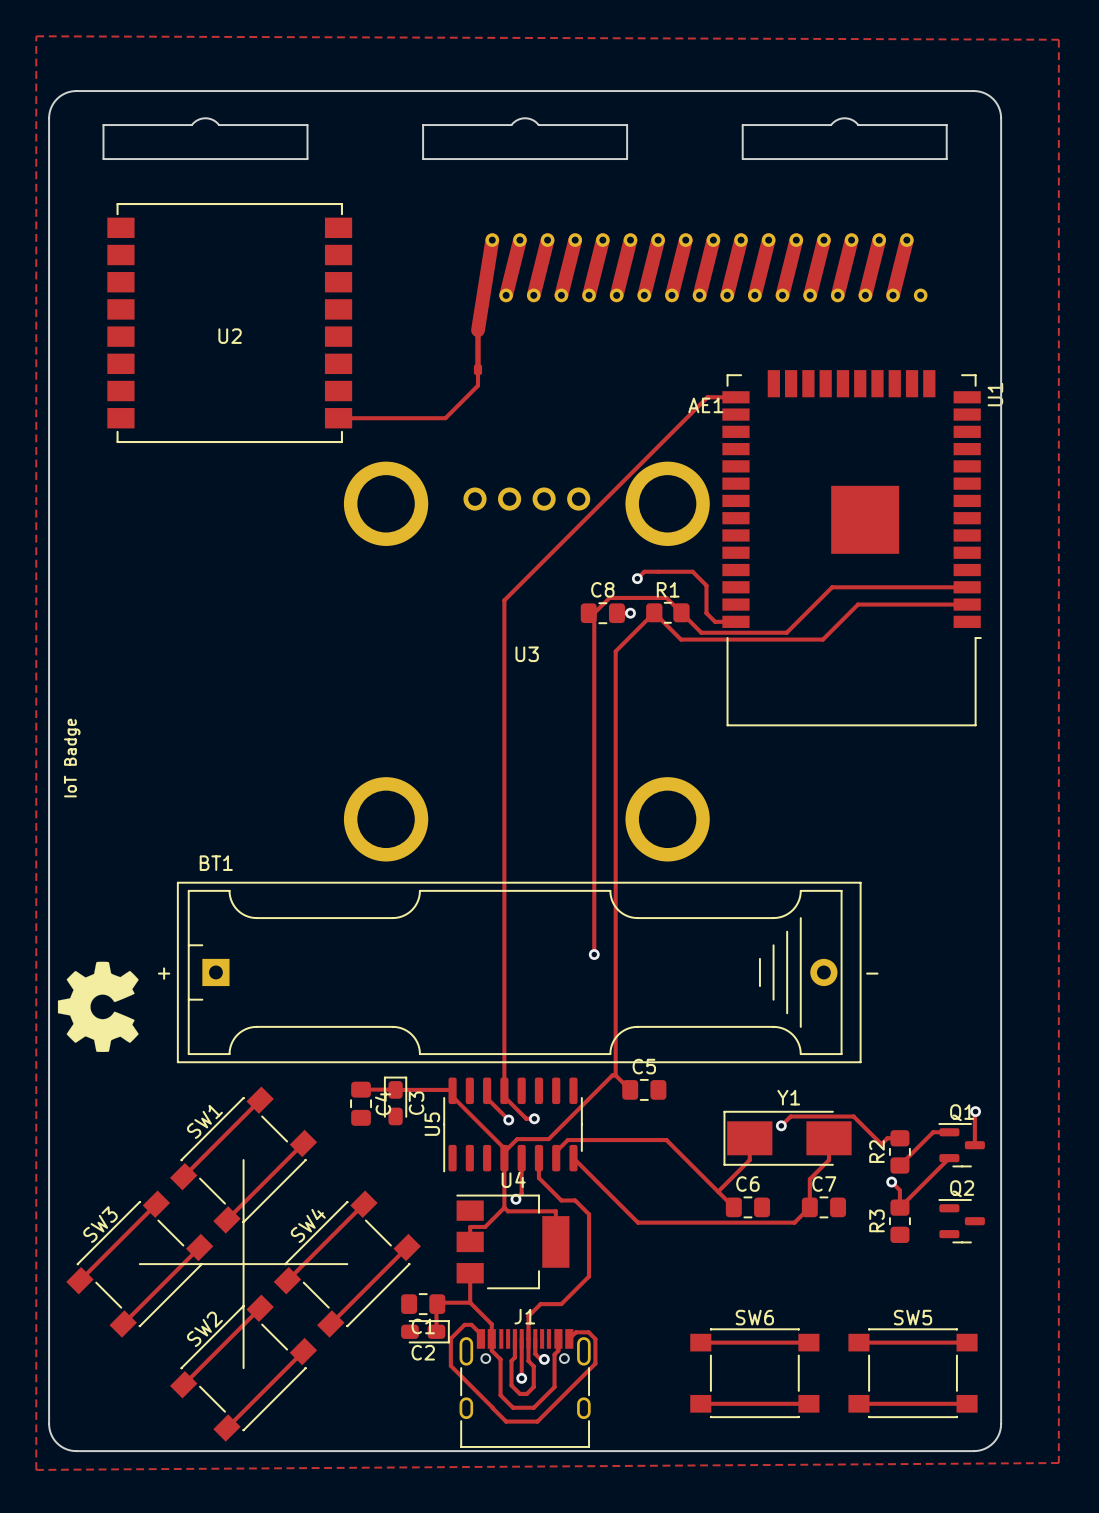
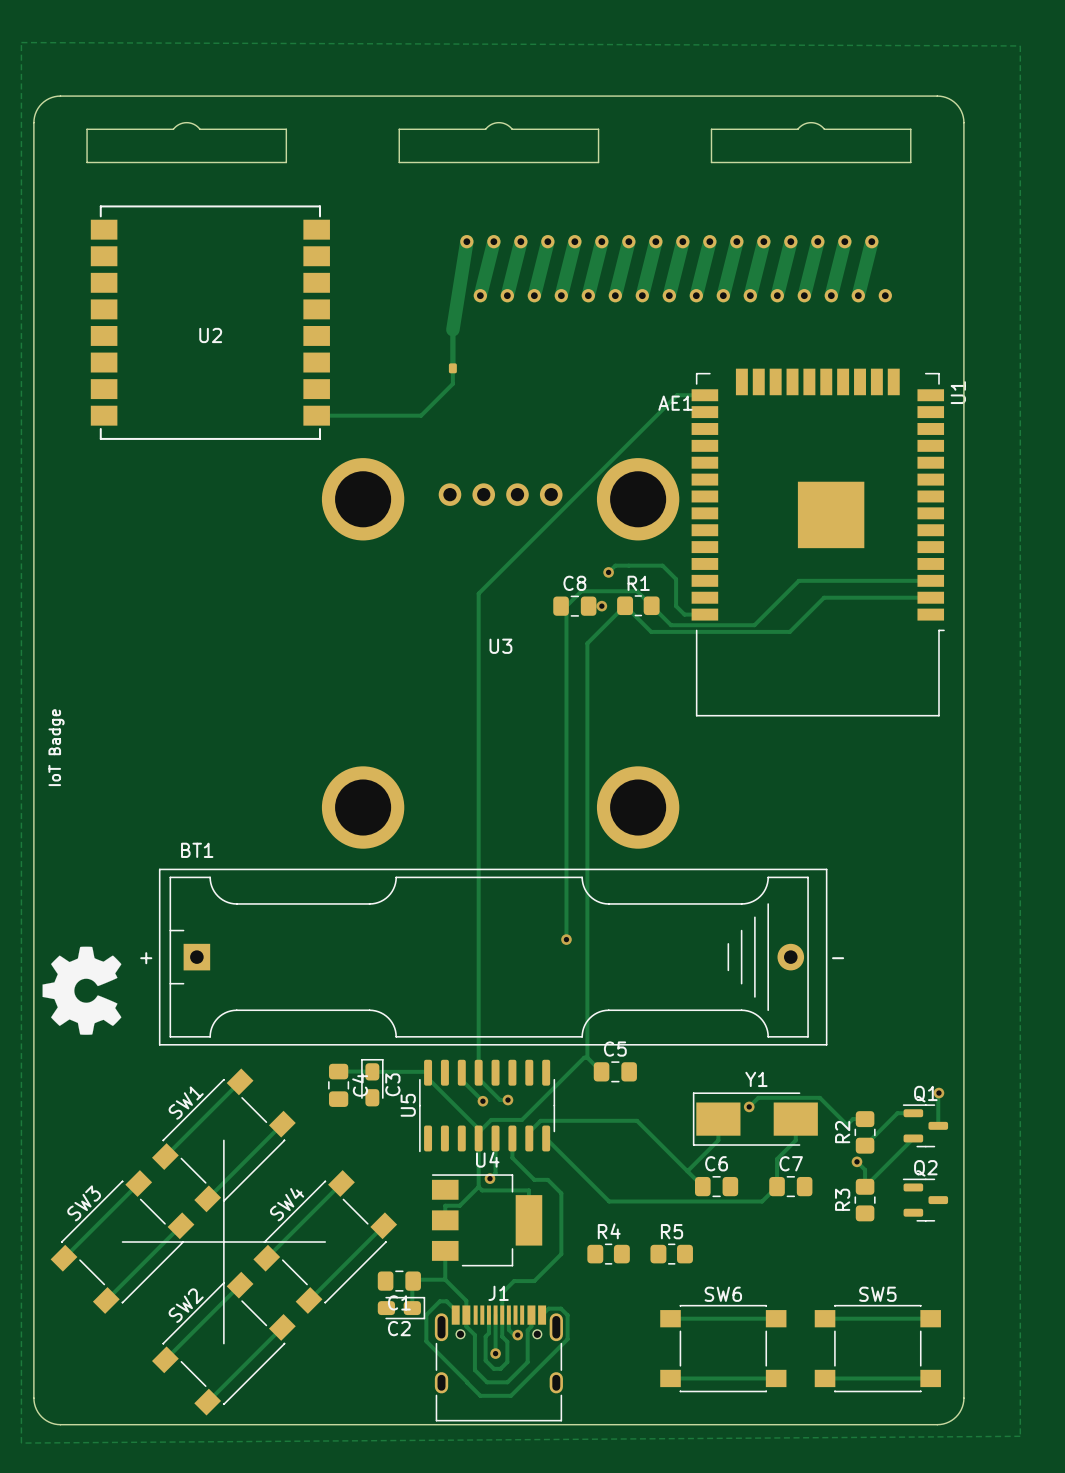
R4: none -> (608, 1254)
R5: none -> (671, 1254)

